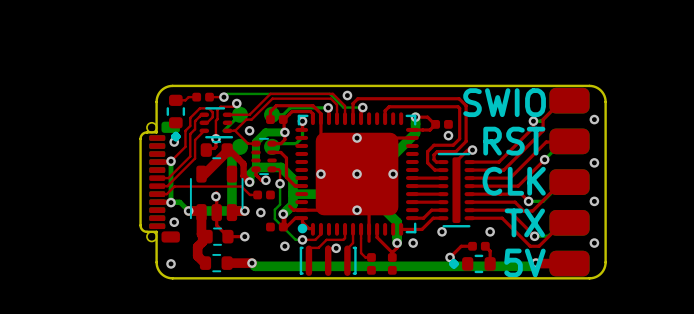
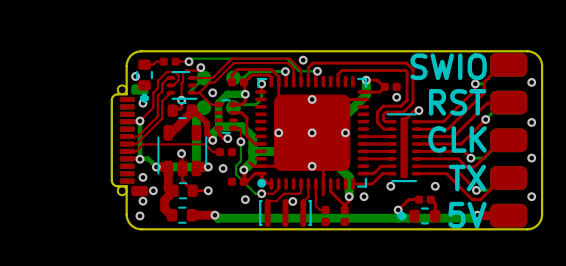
via: none -> (135, 76)
via: none -> (153, 190)
via: none -> (142, 201)

